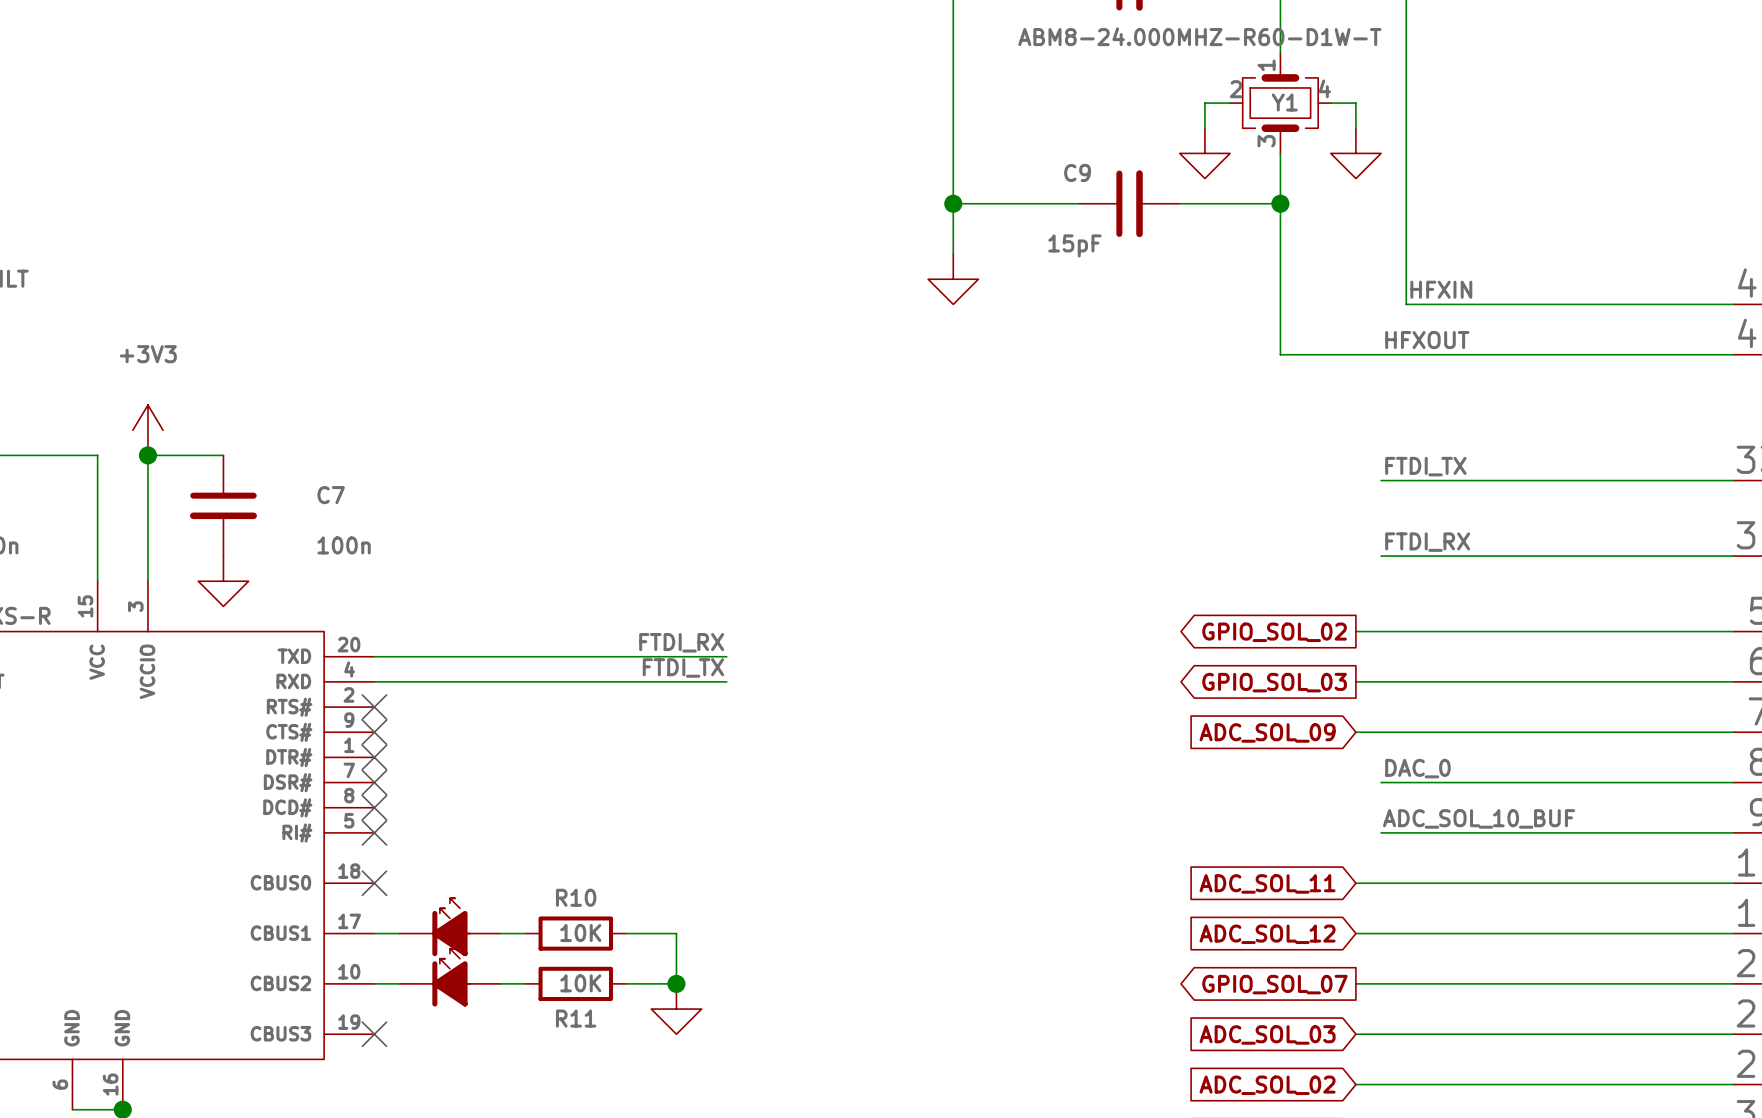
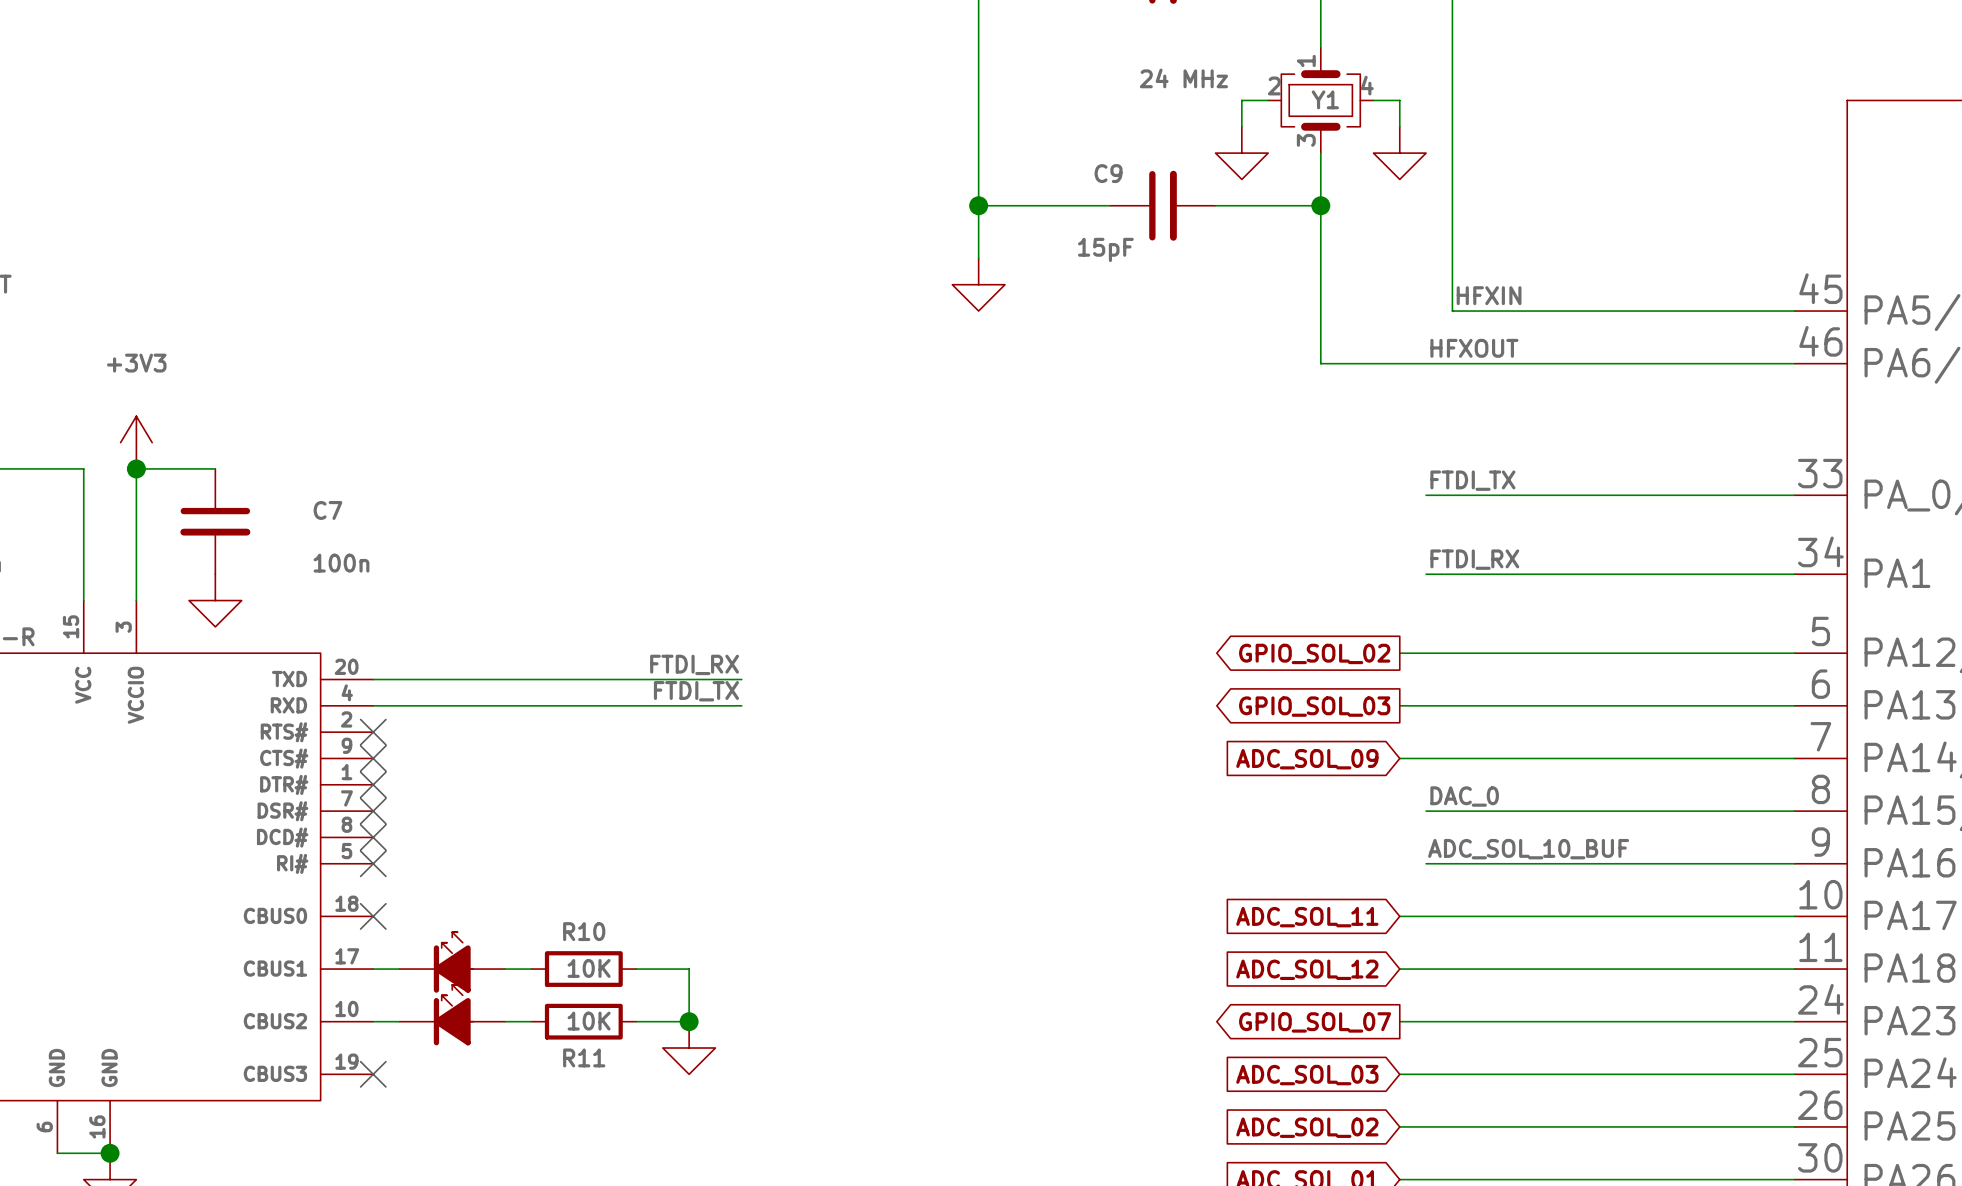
Y1 value: ABM8-24.000MHZ-R60-D1W-T (1199, 36) -> 24 MHz (1183, 78)

